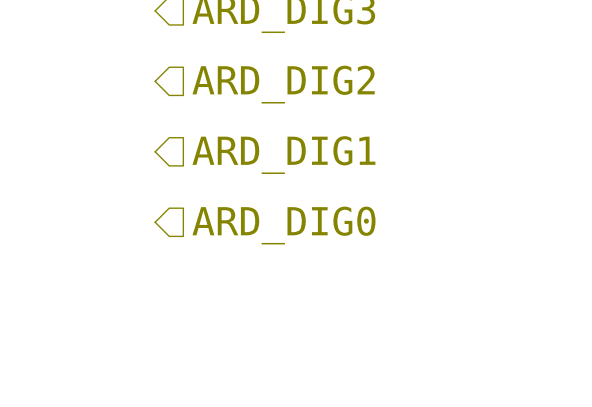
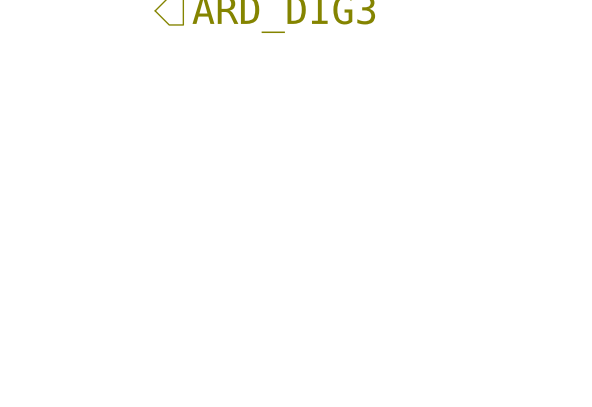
hierarchical label: ARD_DIG2 (283, 84) -> none
hierarchical label: ARD_DIG1 (283, 155) -> none
hierarchical label: ARD_DIG0 (284, 225) -> none

